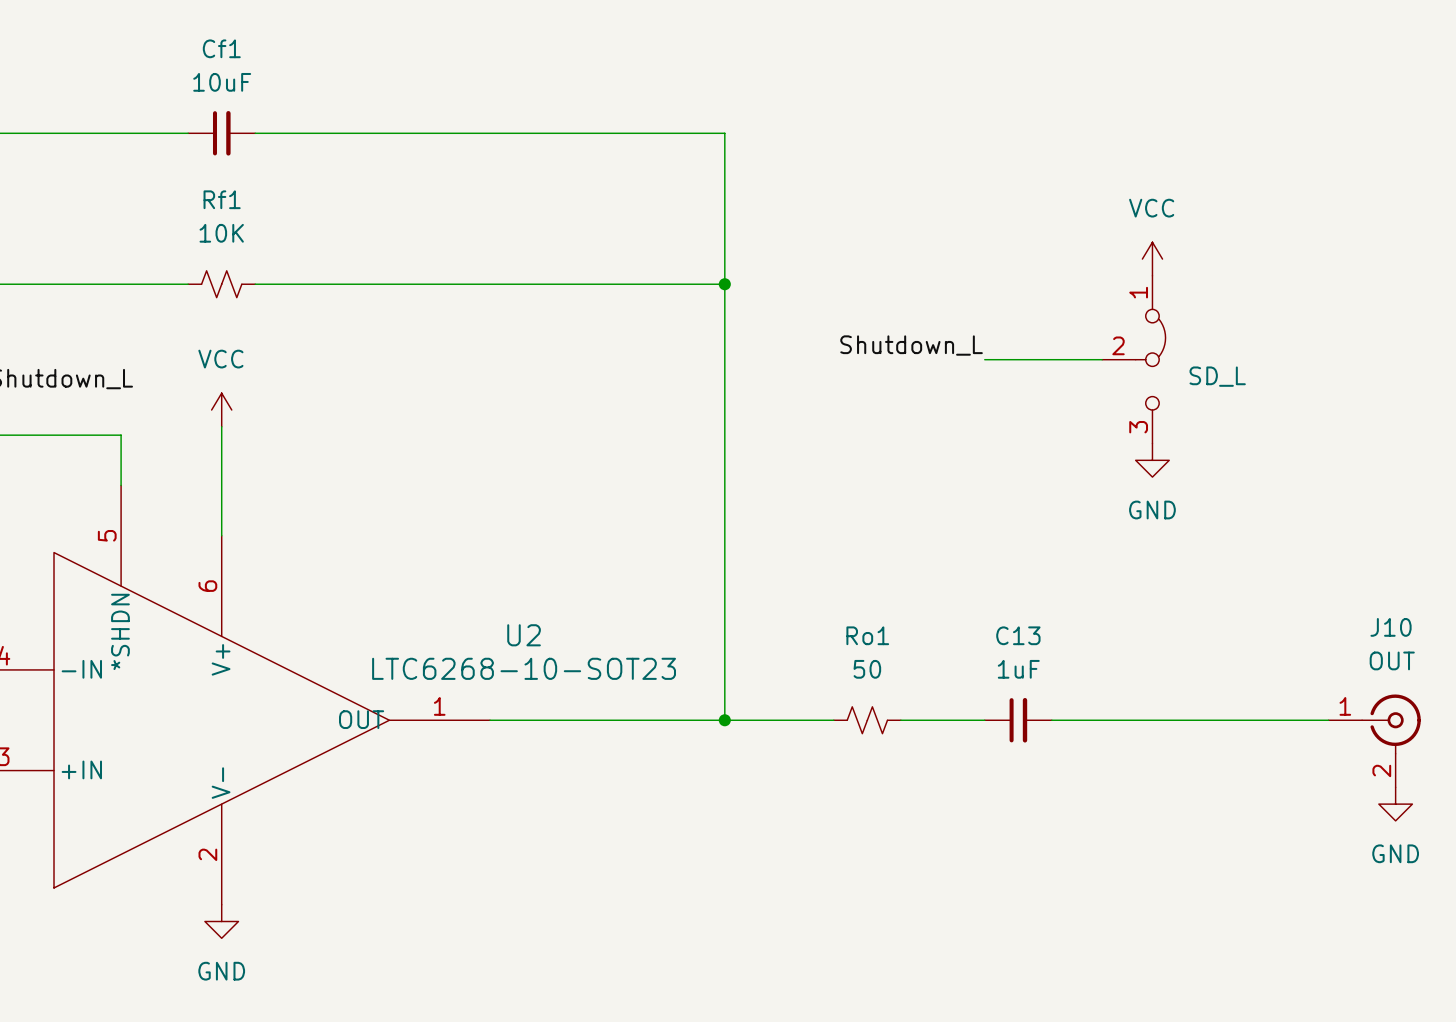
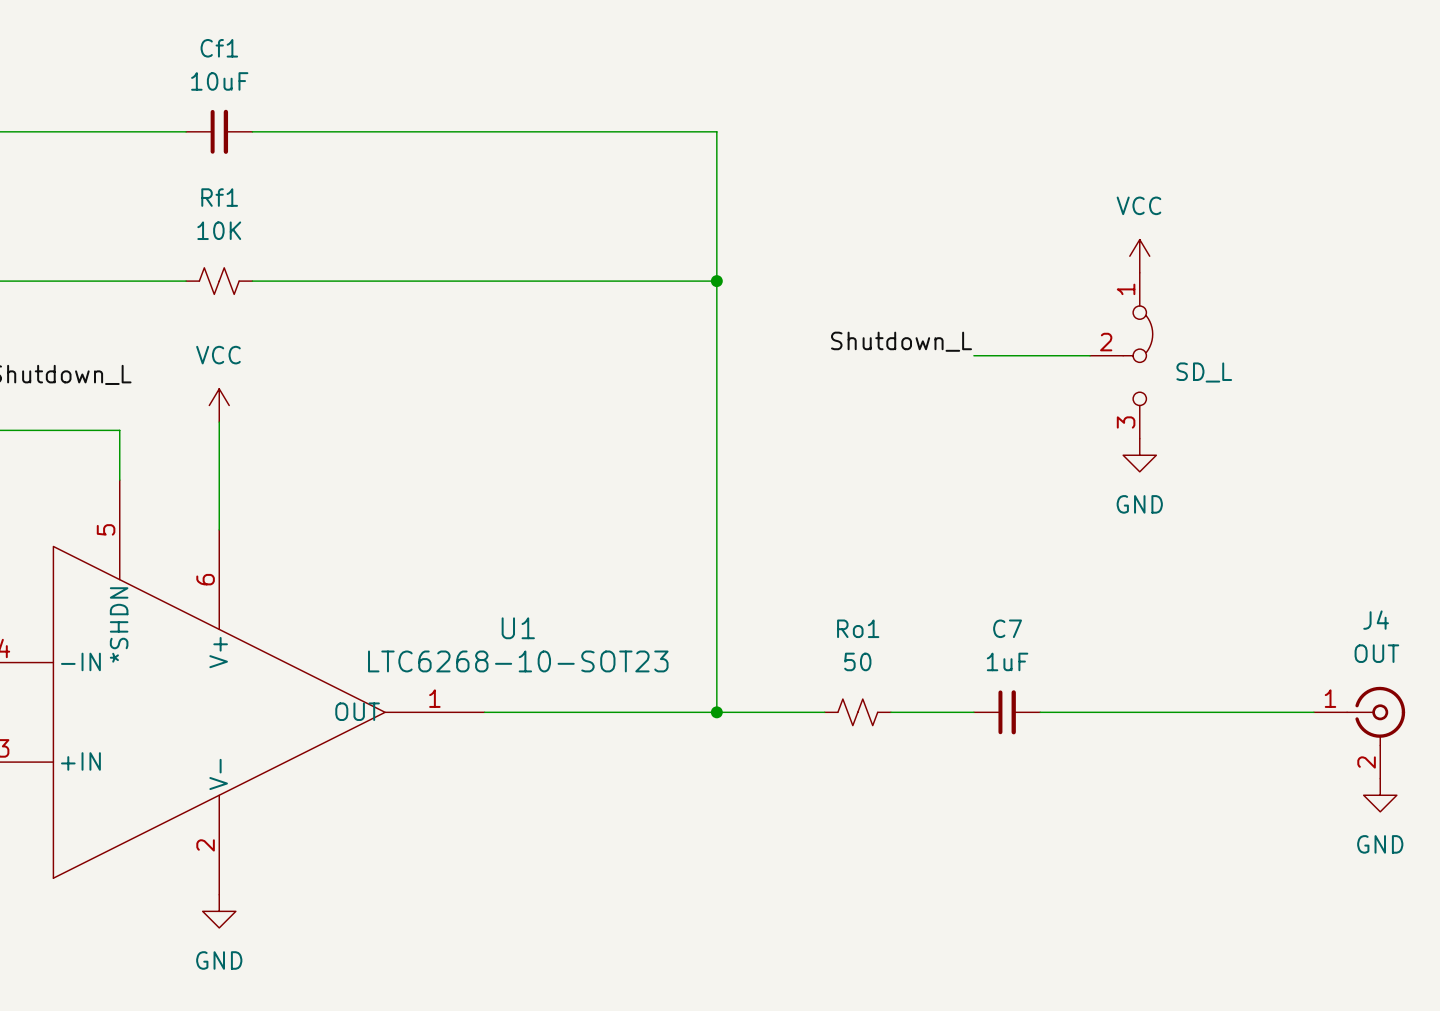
J10 name: J10 (1391, 627) -> J4 (1376, 620)
U2 name: U2 (524, 635) -> U1 (518, 628)
C13 name: C13 (1018, 635) -> C7 (1007, 628)

